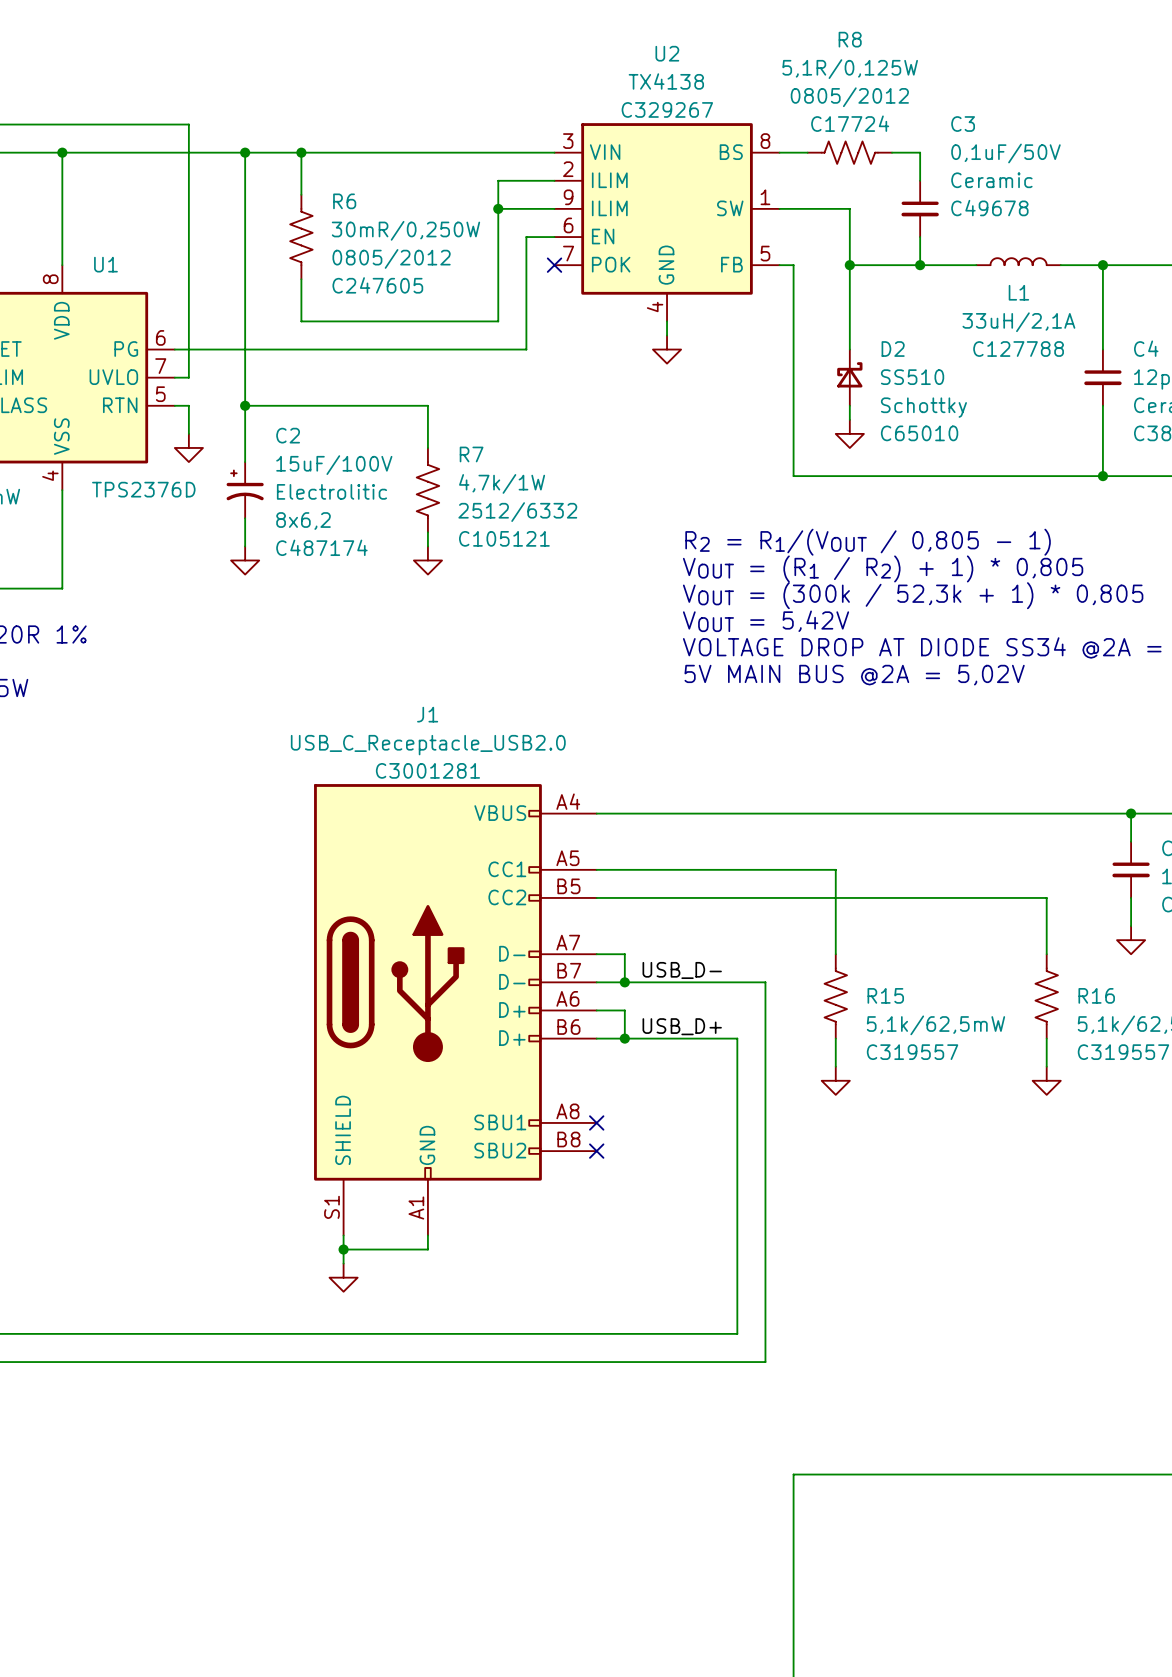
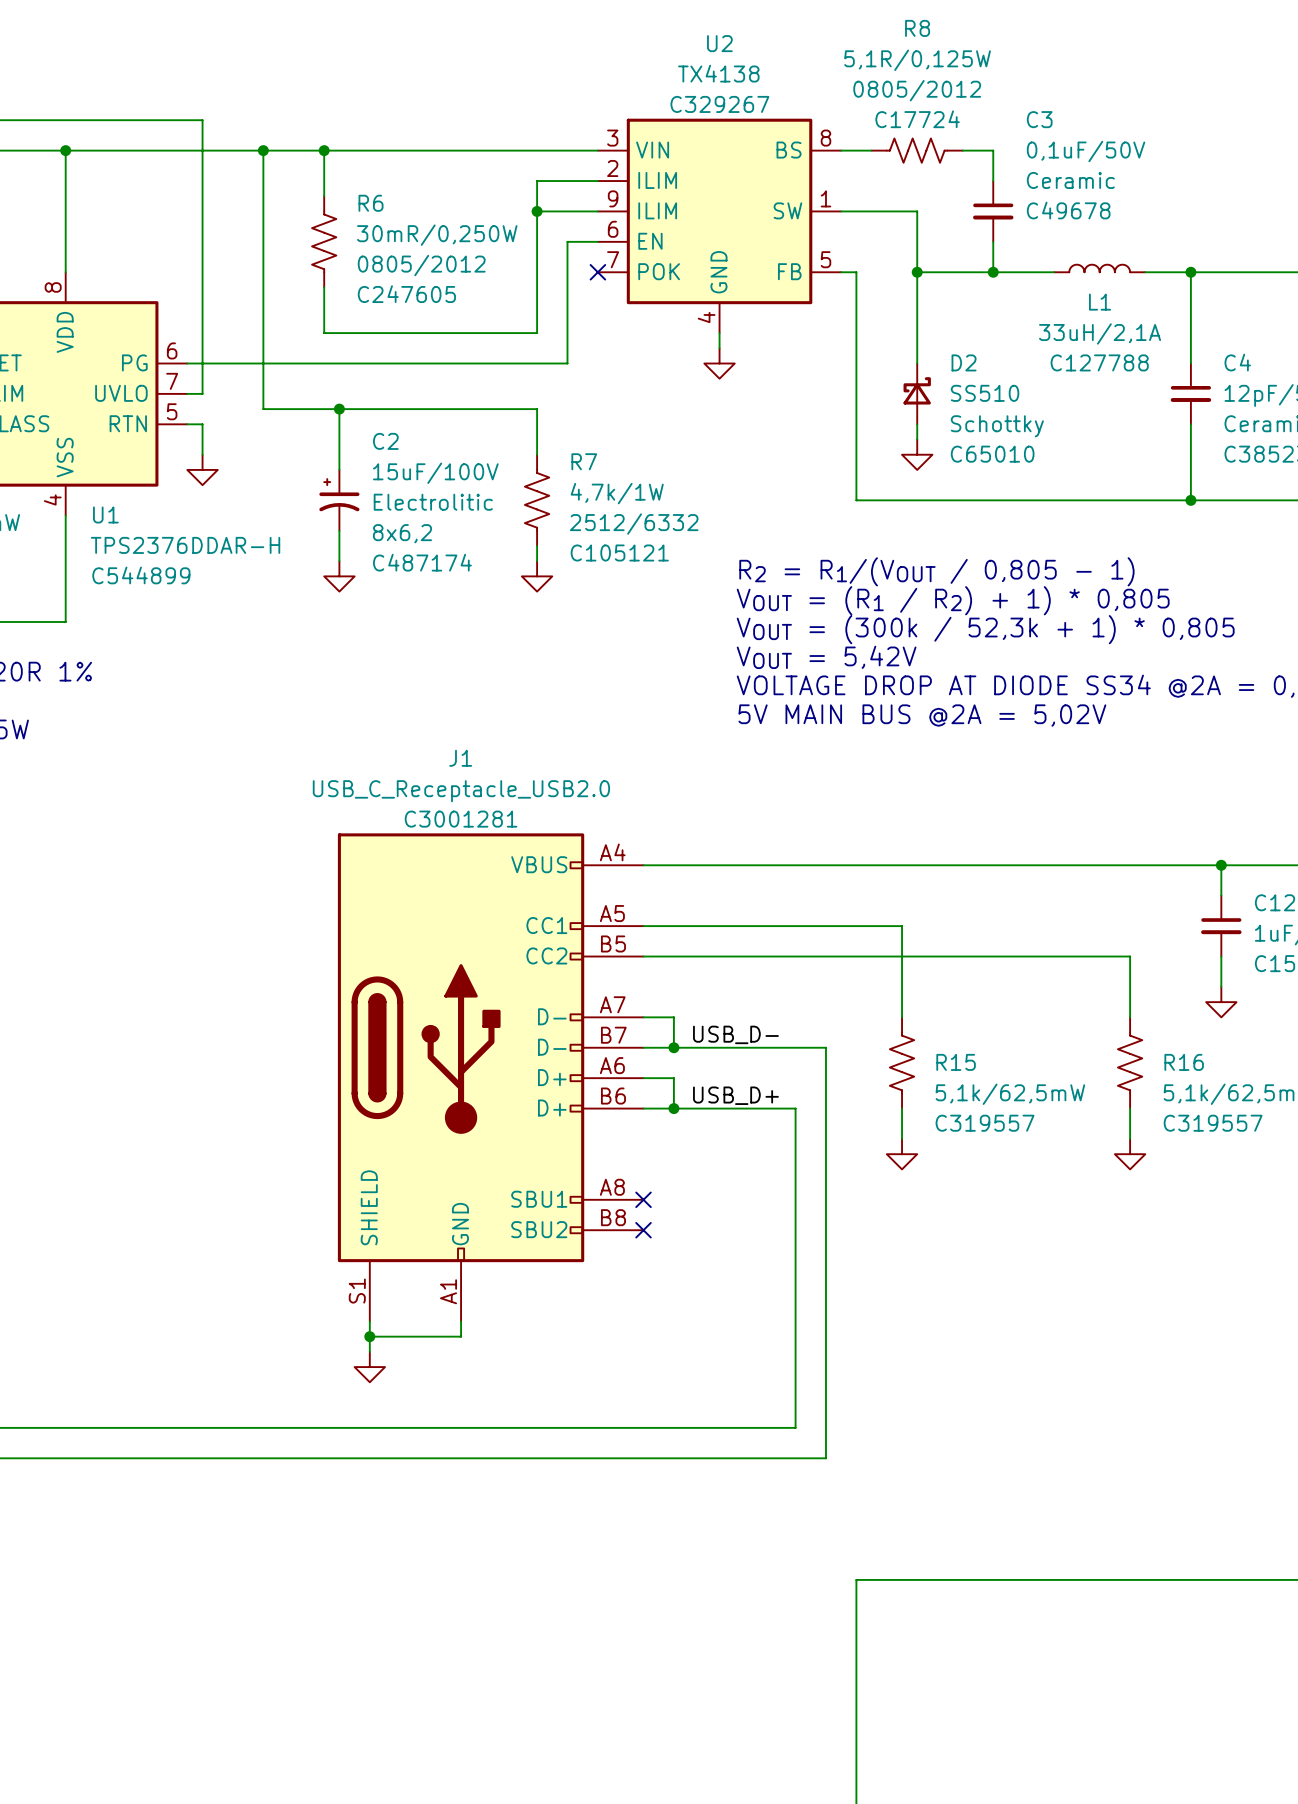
U1 name position: U1 (105, 264) -> U1 (105, 514)
wire: (245, 391) (245, 462) -> (263, 409) (537, 409) (537, 454)
wire: none -> (339, 409) (339, 469)
junction: none -> (339, 409)
wire: (245, 405) (427, 405) (427, 447) -> none
junction: (245, 405) -> none
U1 value: TPS2376D (143, 489) -> TPS2376DDAR-H (185, 545)
C2 position: (245, 490) -> (339, 500)
R7 position: (427, 490) -> (537, 500)
wire: (245, 518) (245, 546) -> (339, 530) (339, 561)
wire: (427, 532) (427, 546) -> (537, 545) (537, 561)
U1 text: none -> C544899 (141, 575)
power symbol: none -> (339, 576)
power symbol: none -> (537, 576)
power symbol: (245, 560) -> none
power symbol: (427, 560) -> none

